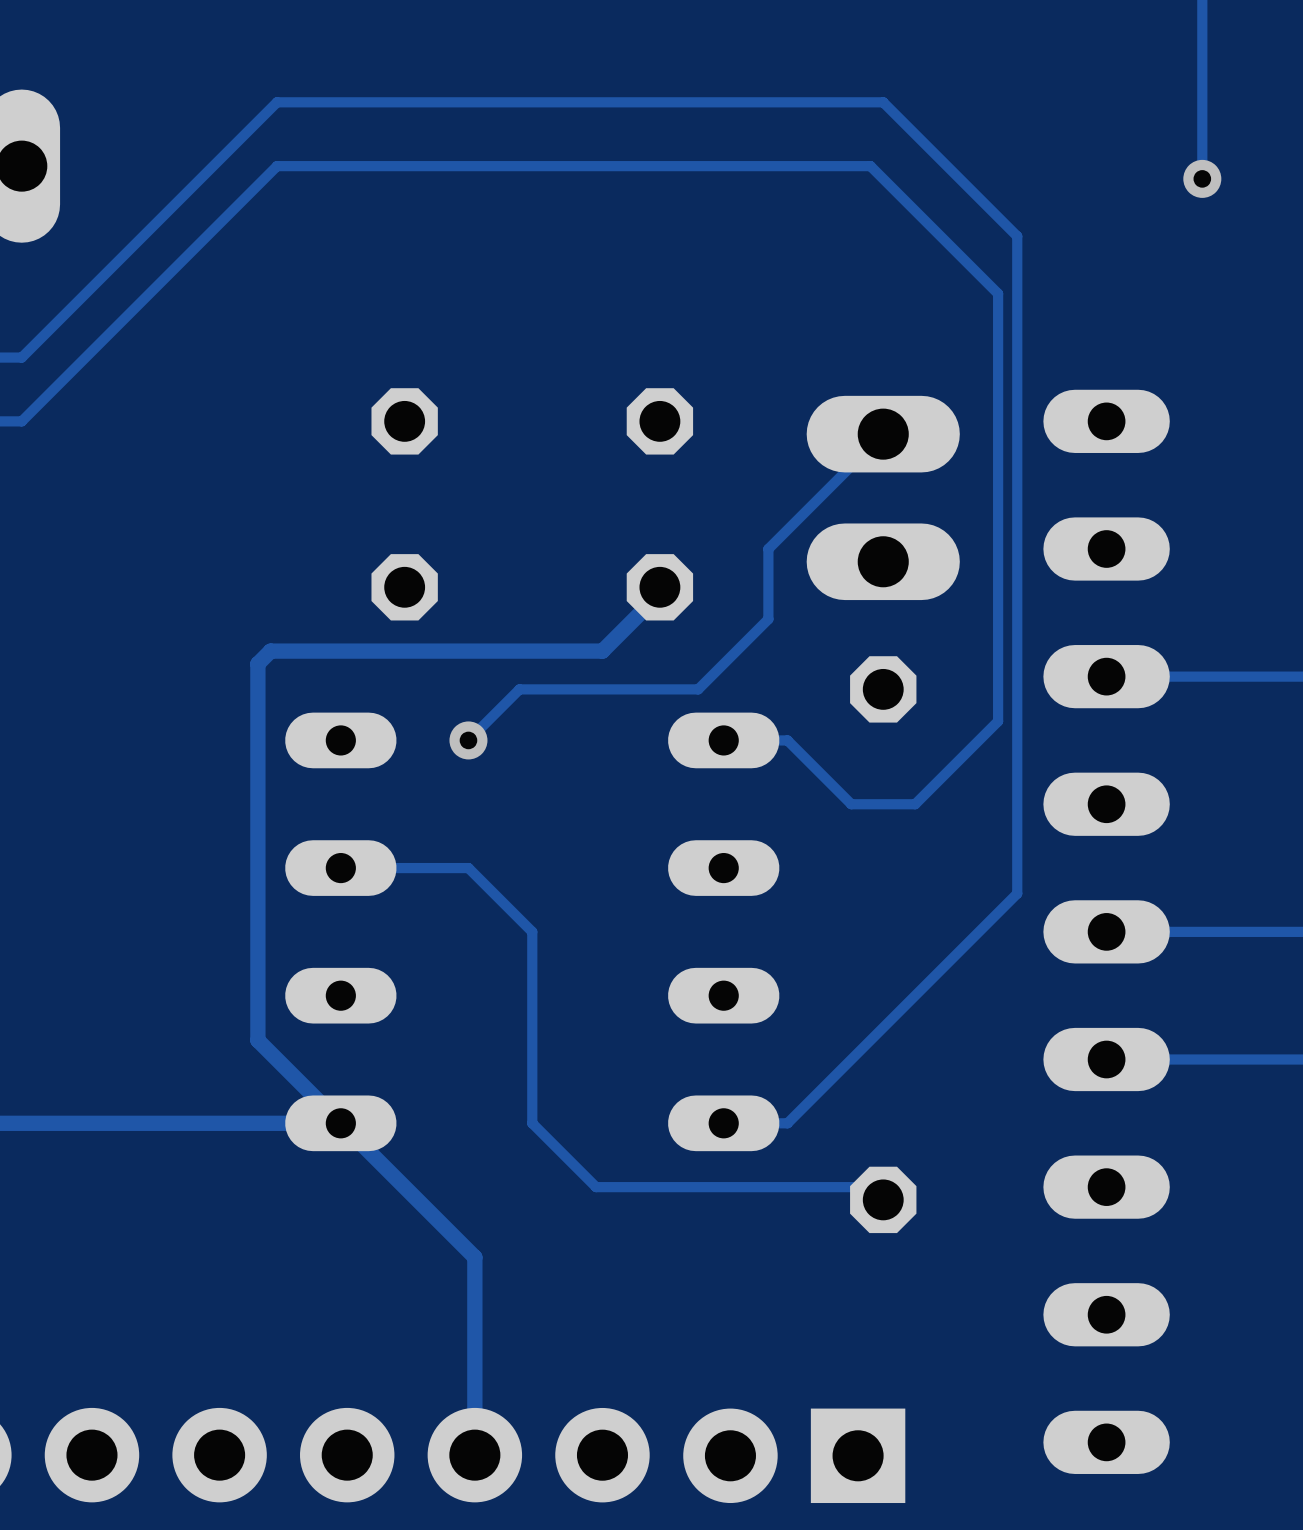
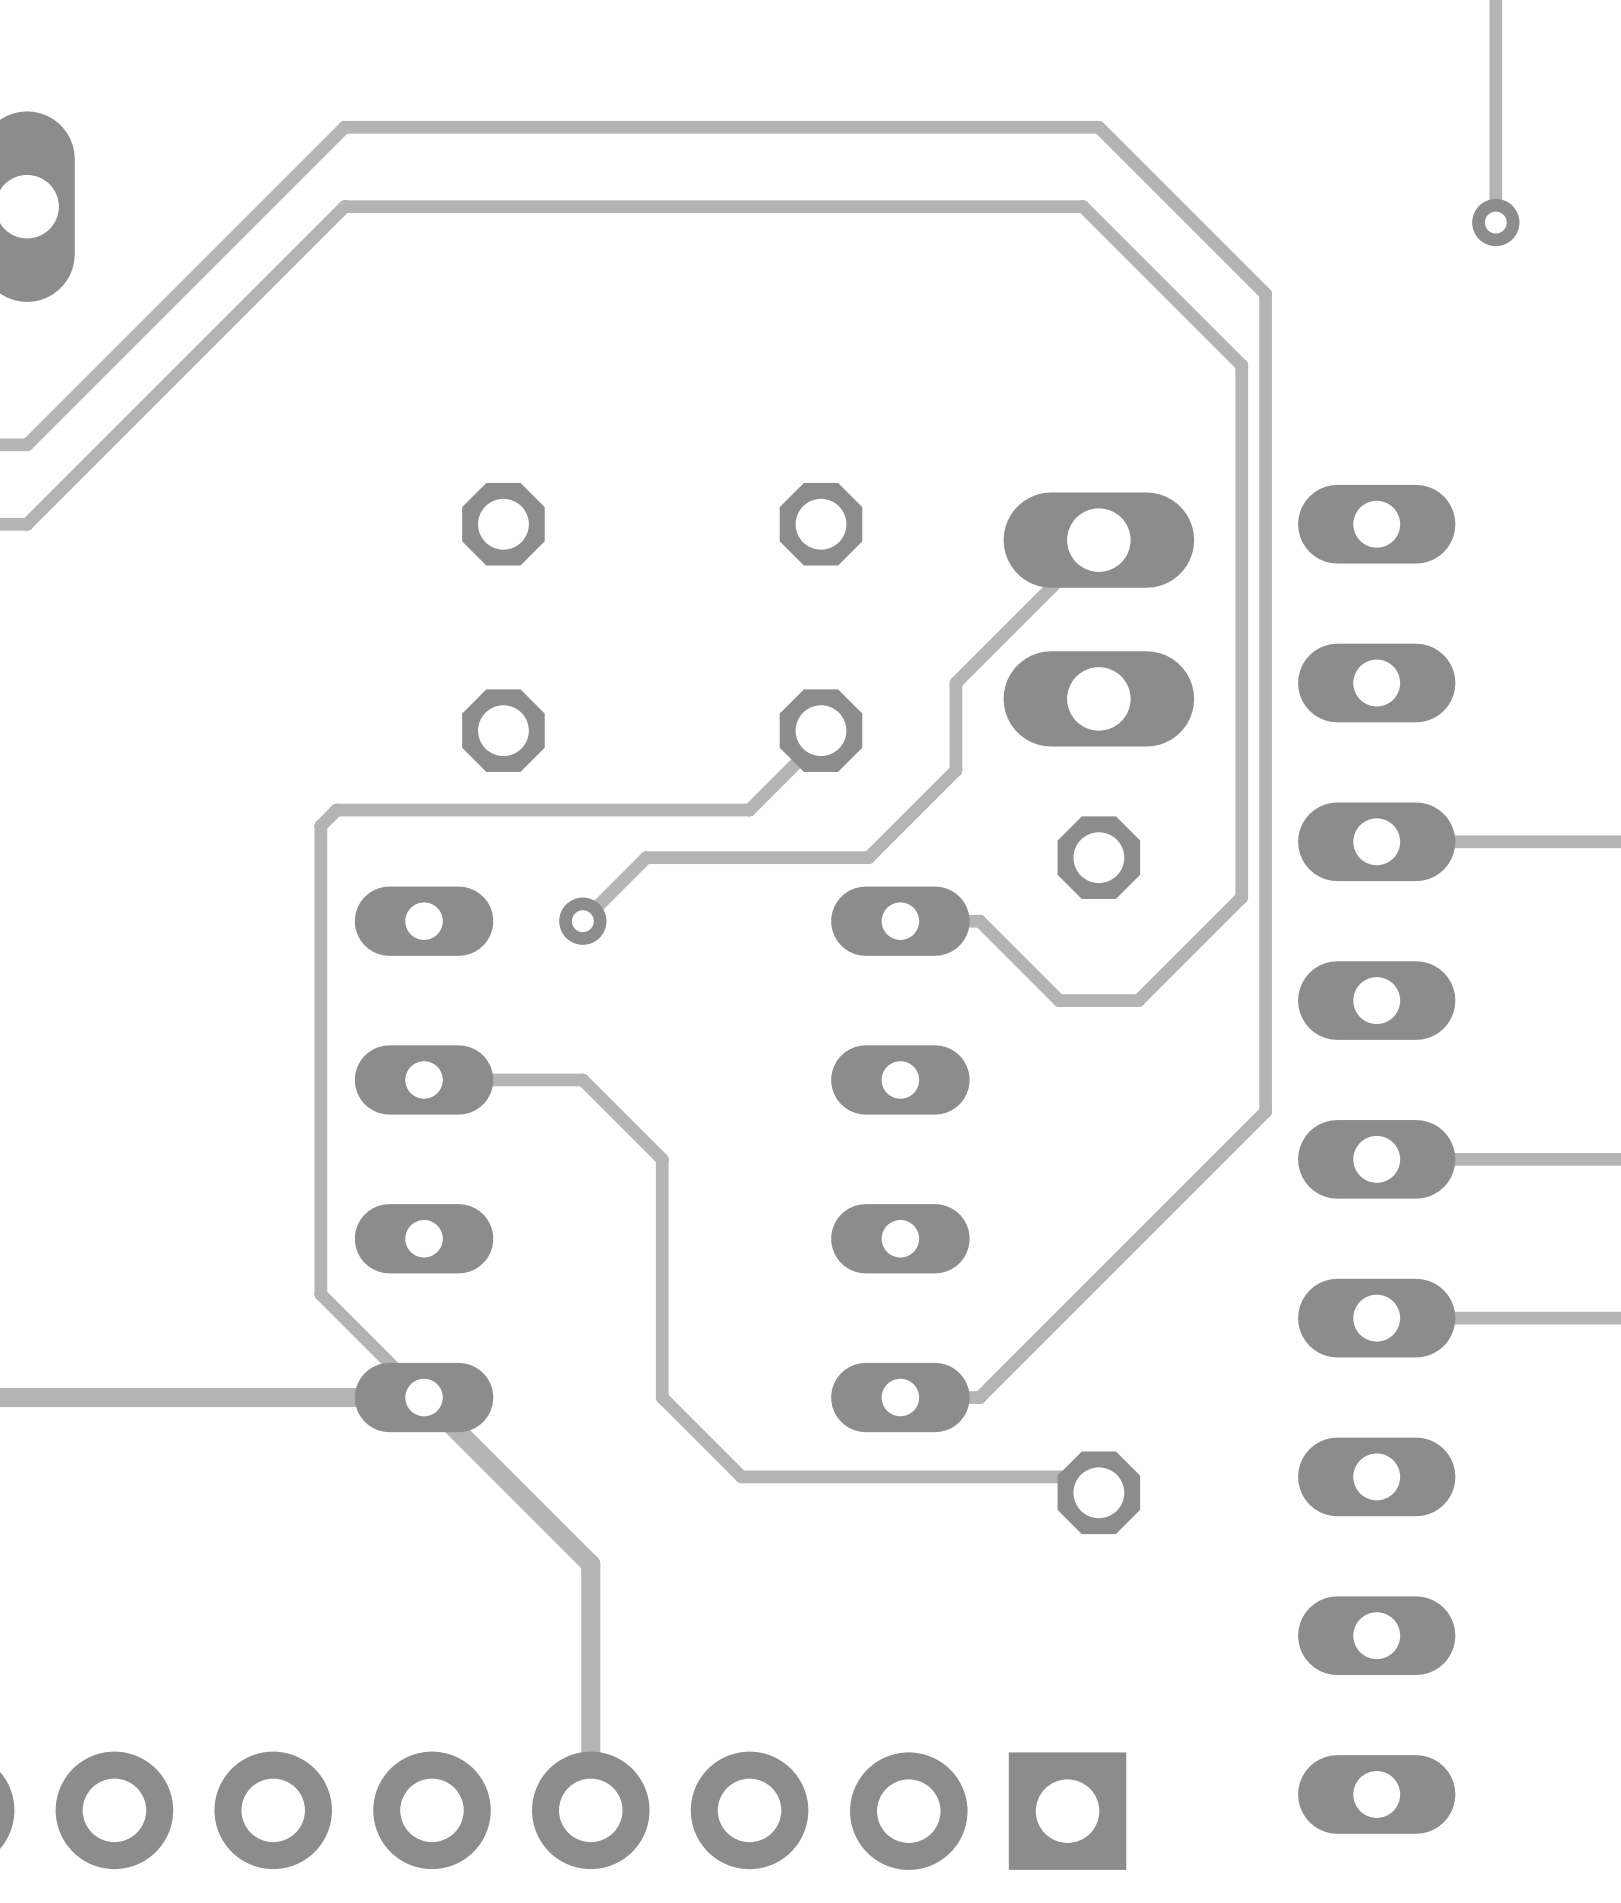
track width: thick (659, 593) (602, 651) (270, 651) (257, 663) (257, 1040) (340, 1123) -> thin (821, 738) (749, 810) (336, 810) (320, 825) (320, 1294) (424, 1397)

